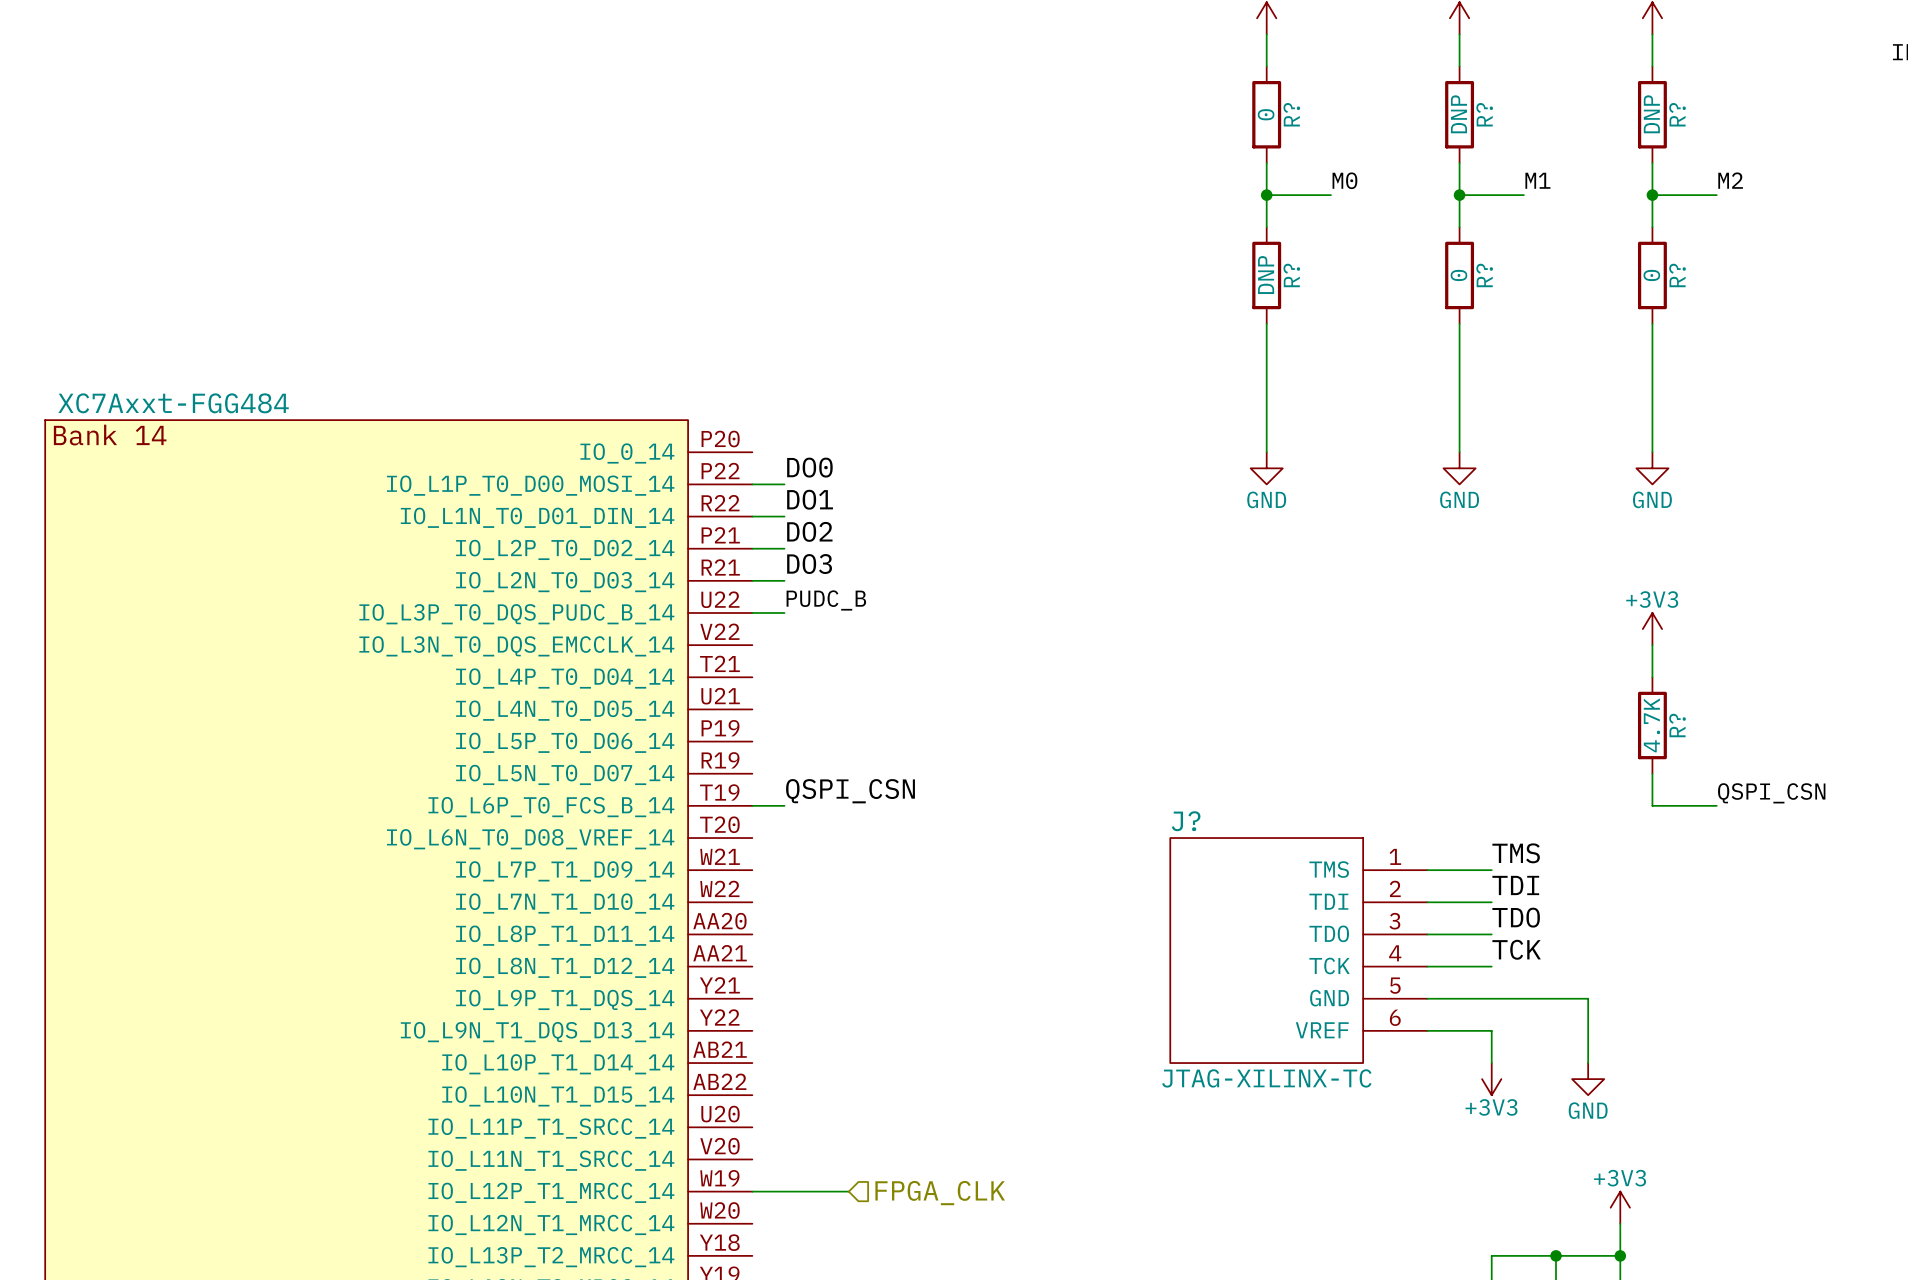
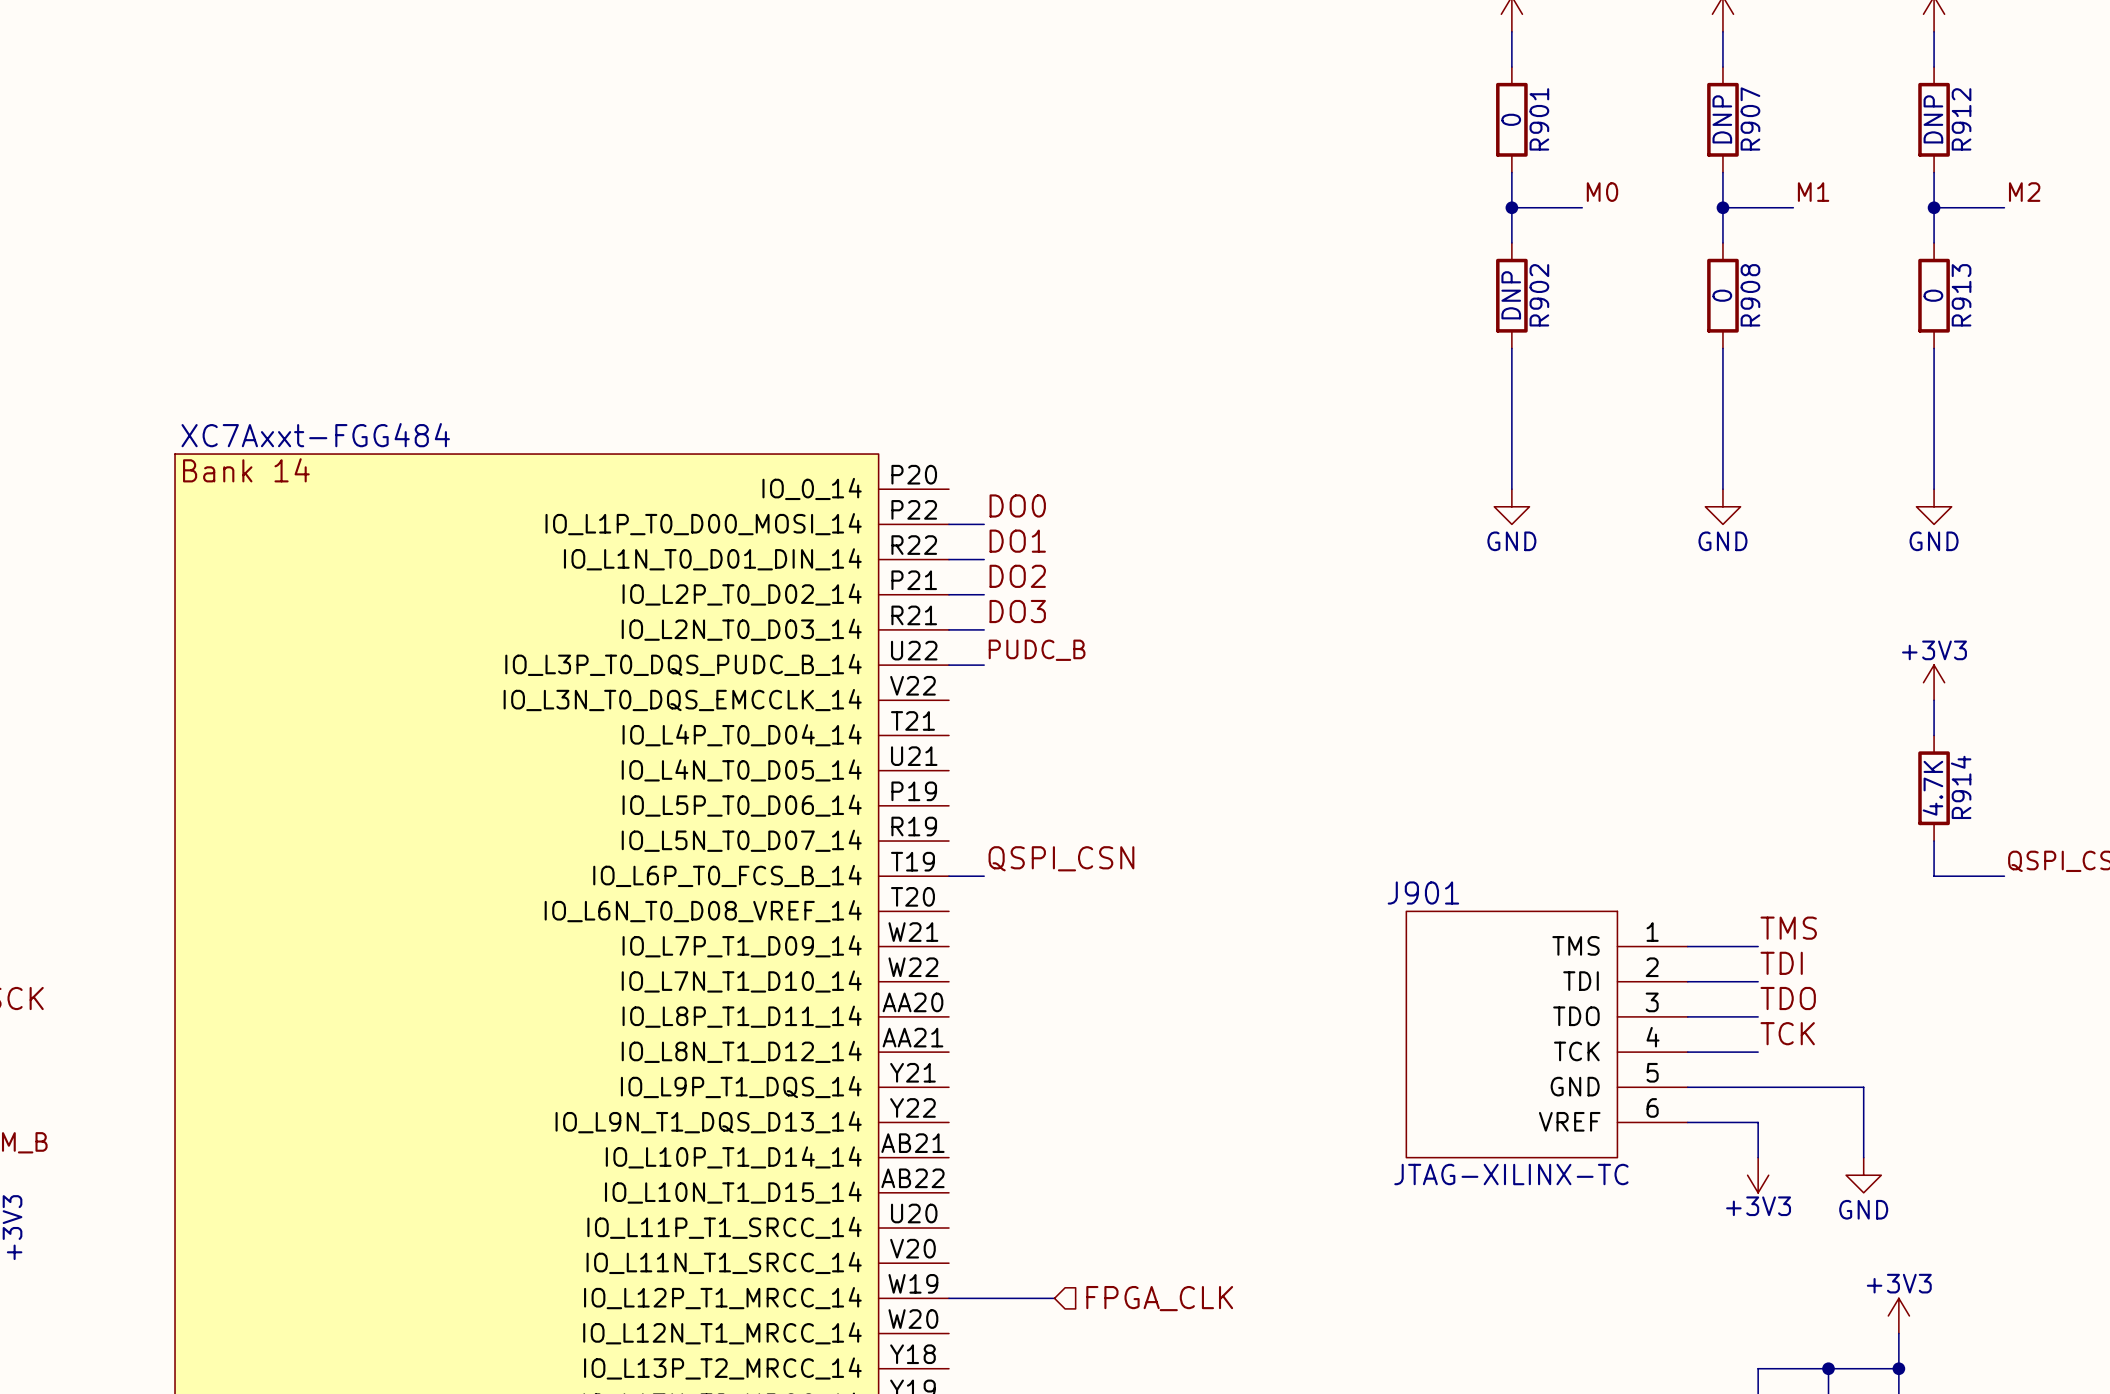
R? name: R? (1291, 114) -> R901 (1539, 119)
R? name: R? (1484, 114) -> R907 (1750, 118)
R? name: R? (1677, 114) -> R912 (1961, 119)
R? name: R? (1291, 275) -> R902 (1539, 295)
R? name: R? (1484, 275) -> R908 (1750, 295)
R? name: R? (1677, 275) -> R913 (1961, 295)
R? name: R? (1677, 725) -> R914 (1961, 787)
J? name: J? (1186, 821) -> J901 (1423, 893)

